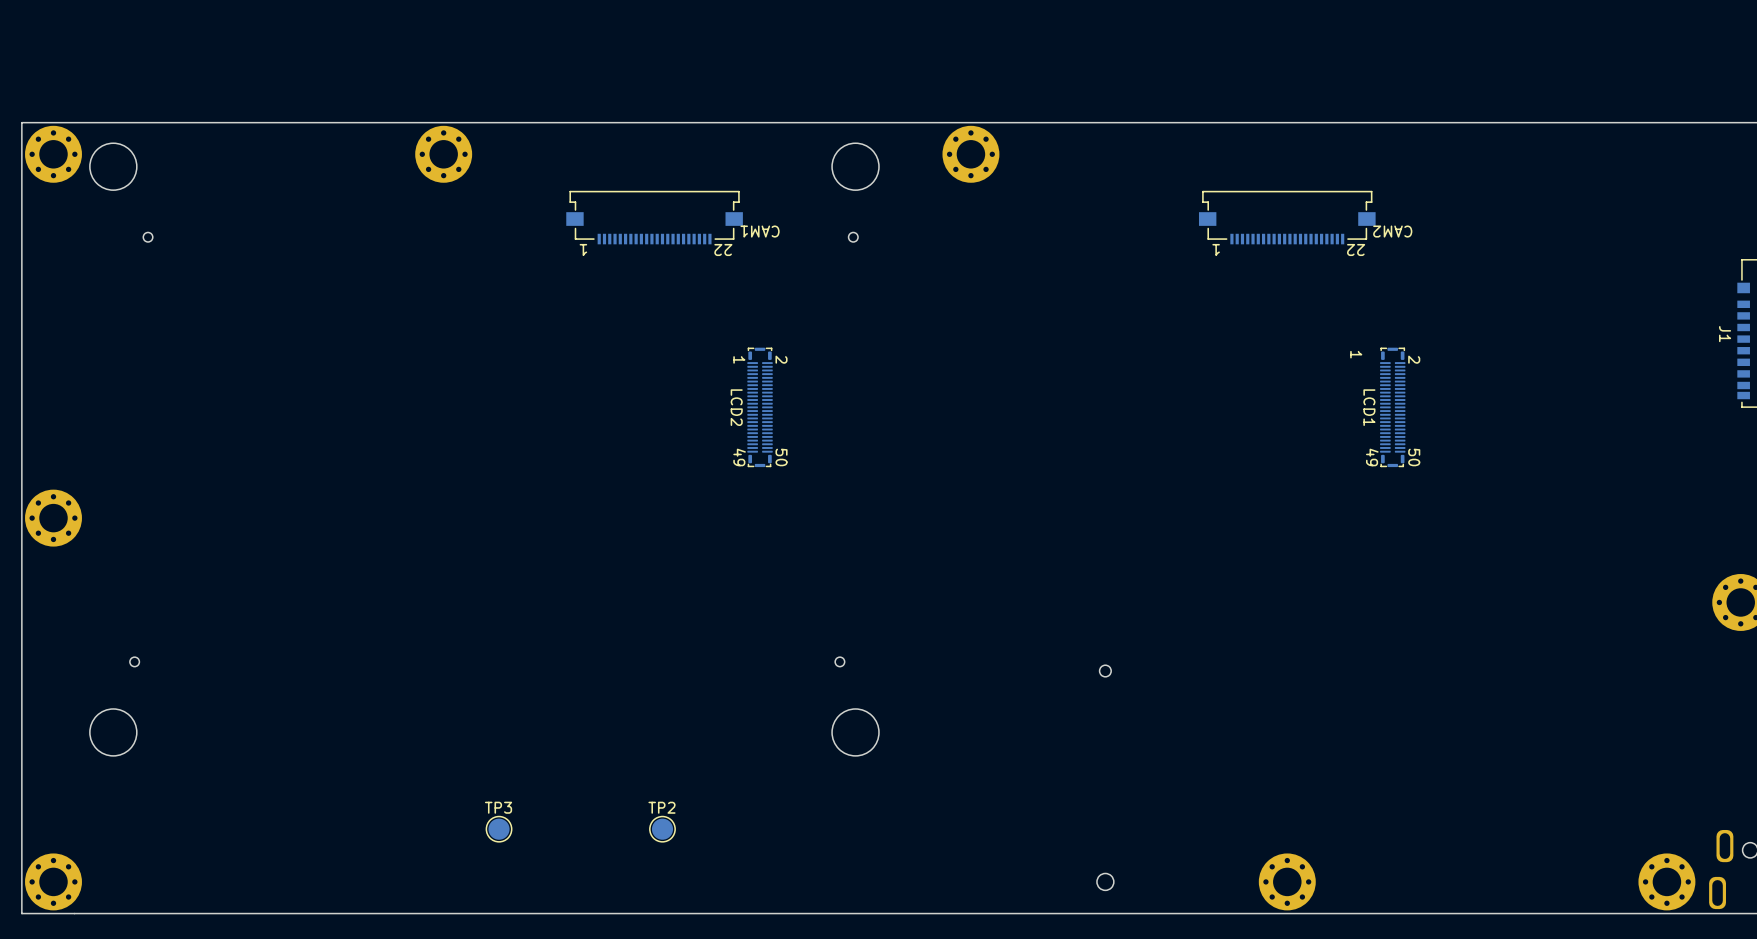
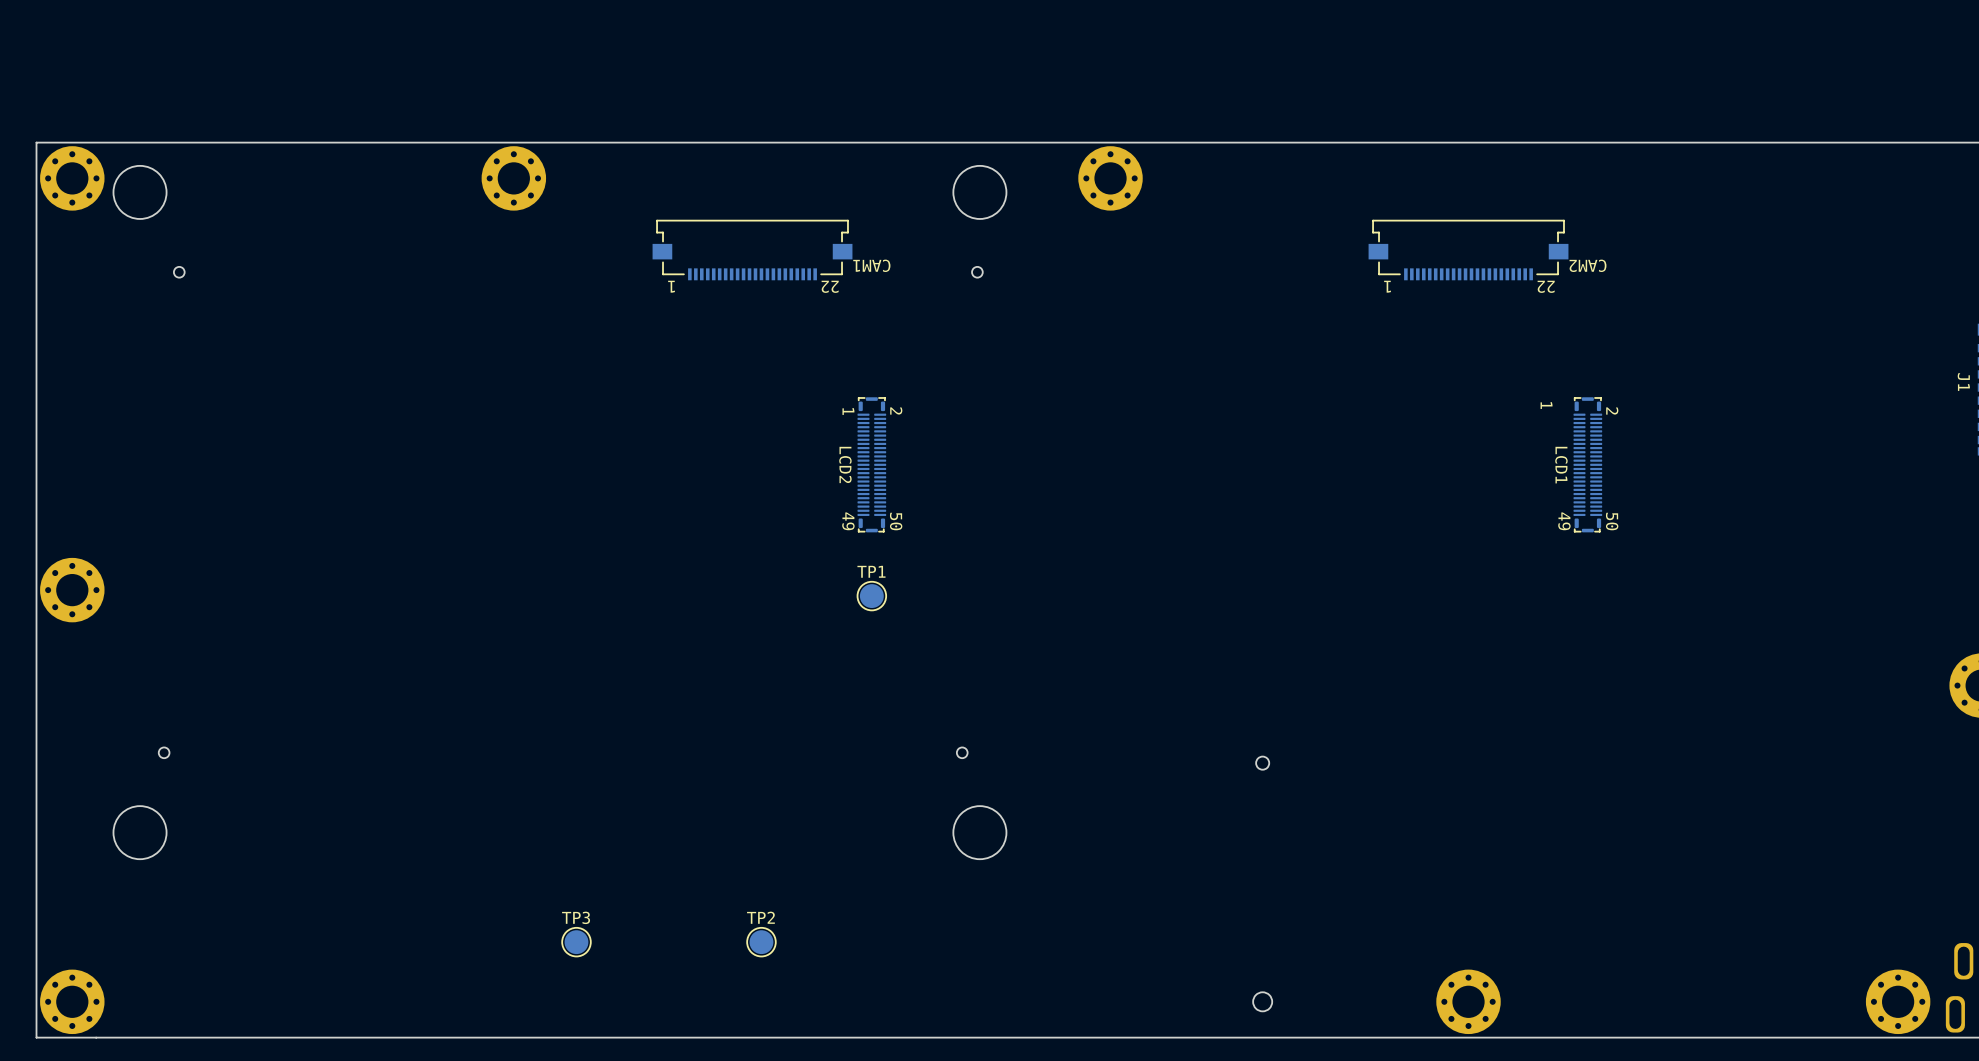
TP1: none -> (871, 596)

